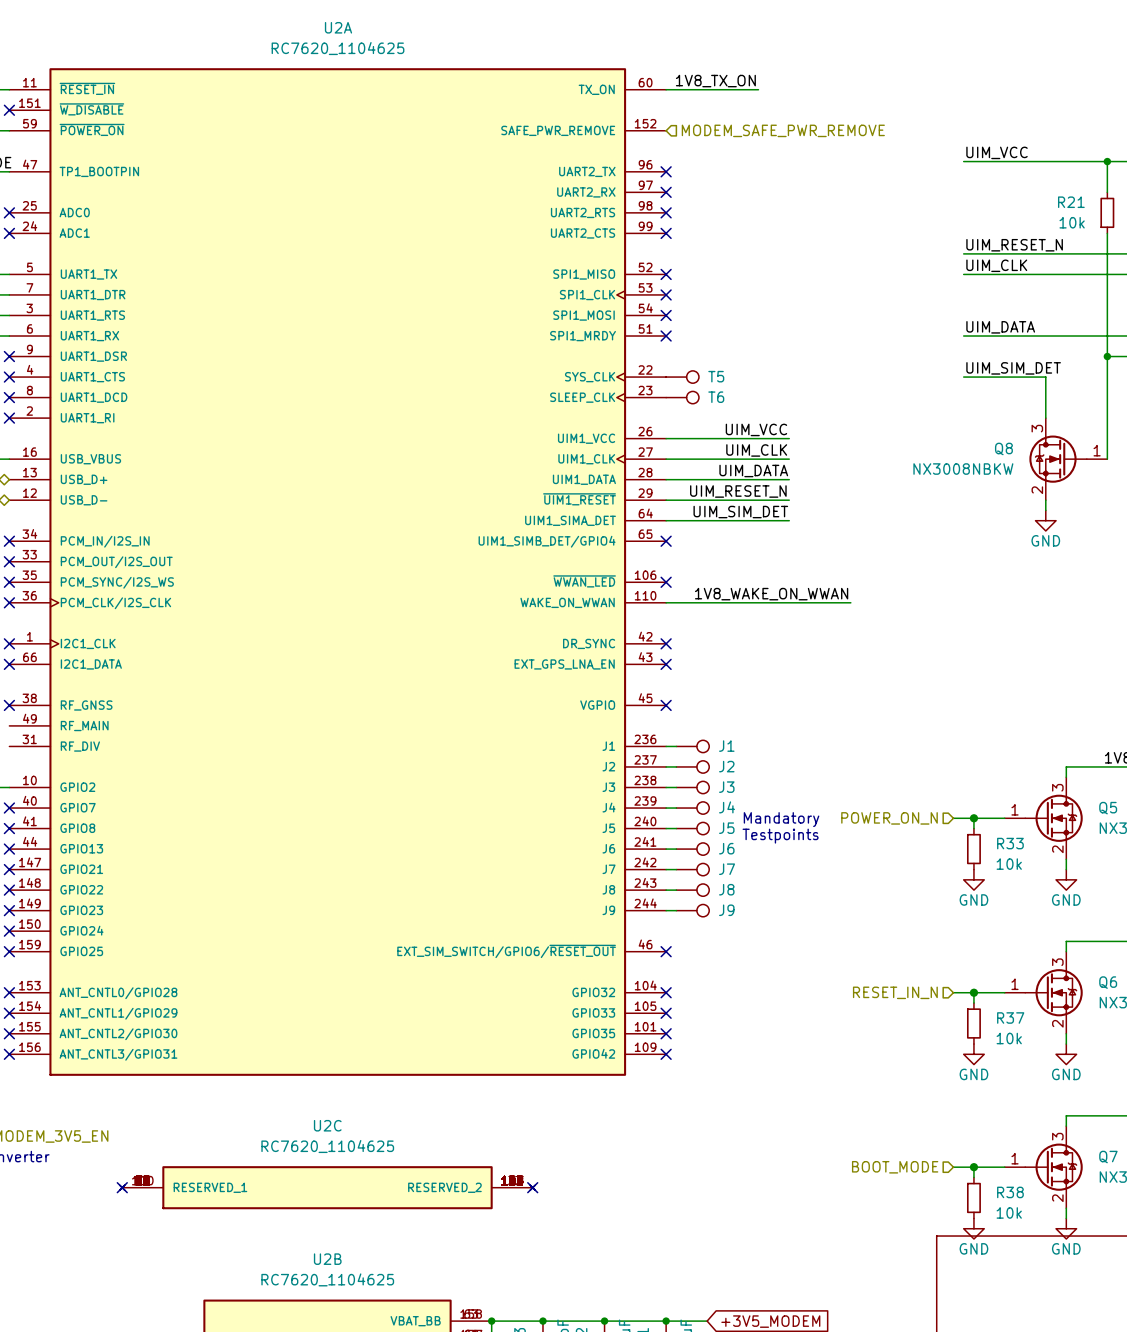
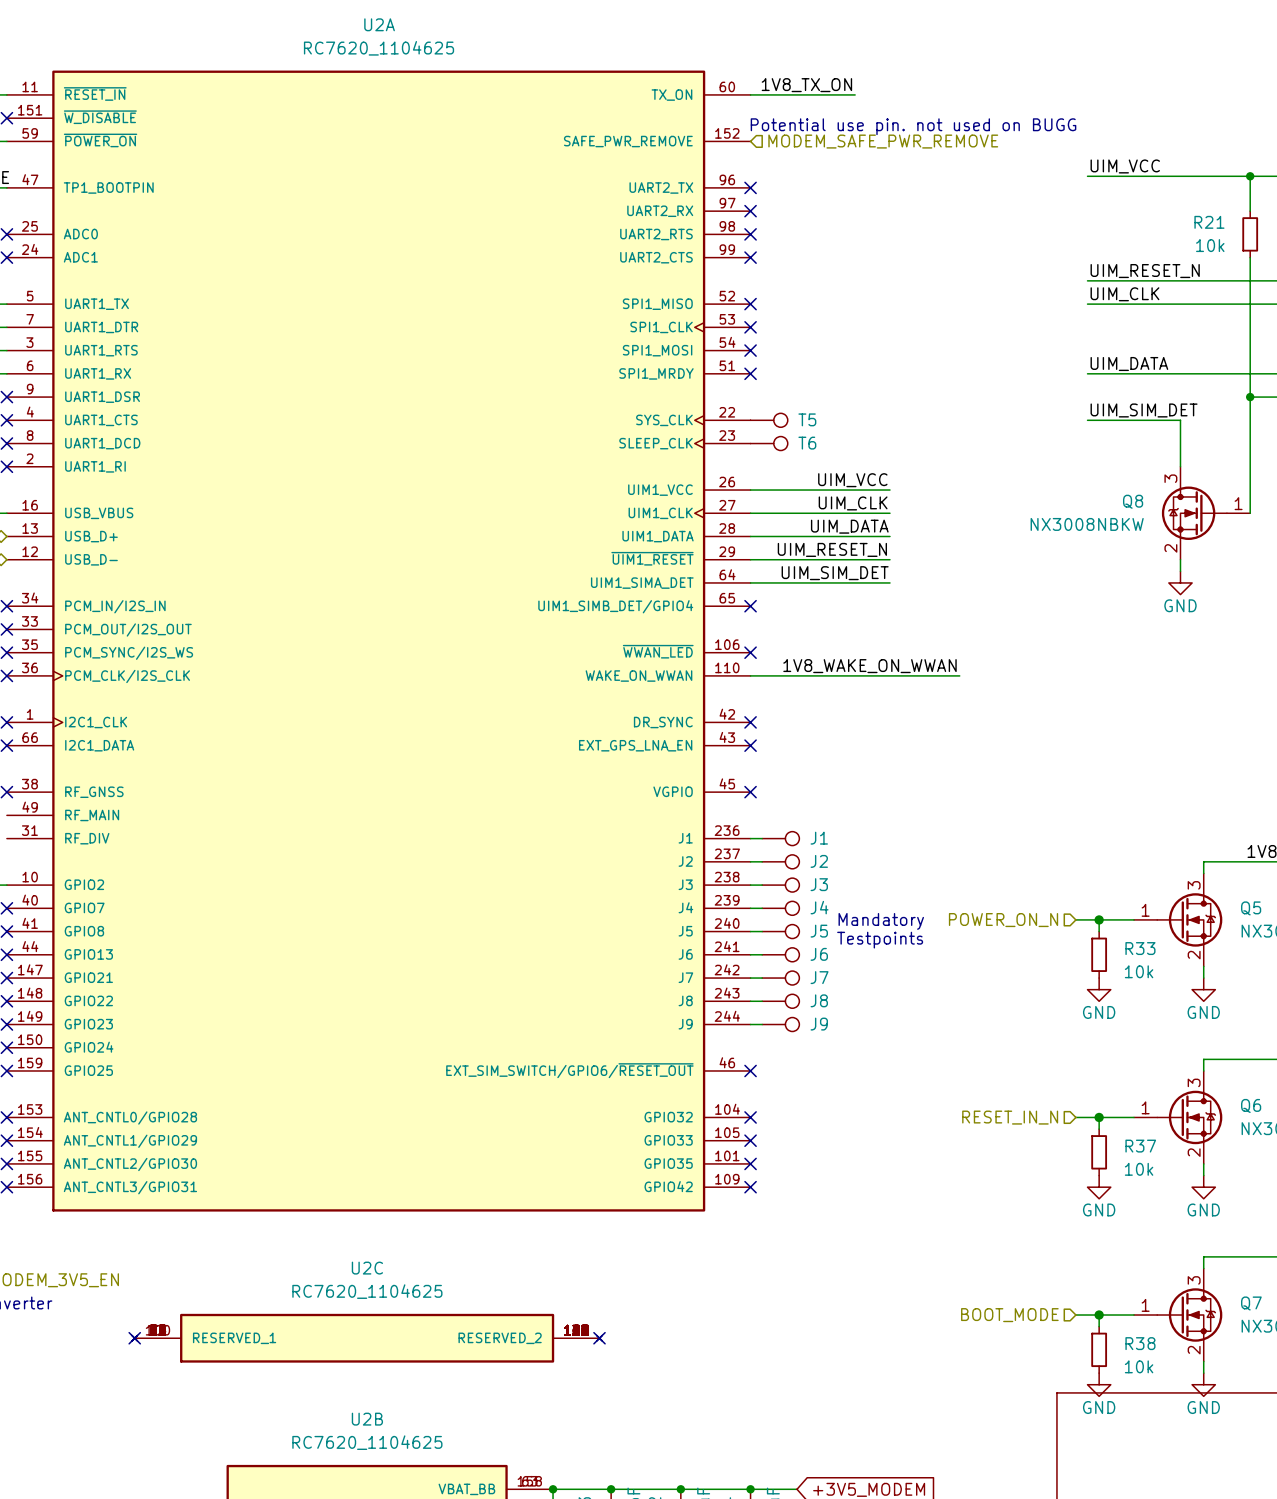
text: none -> Potential use pin. not used on BUGG (913, 126)

